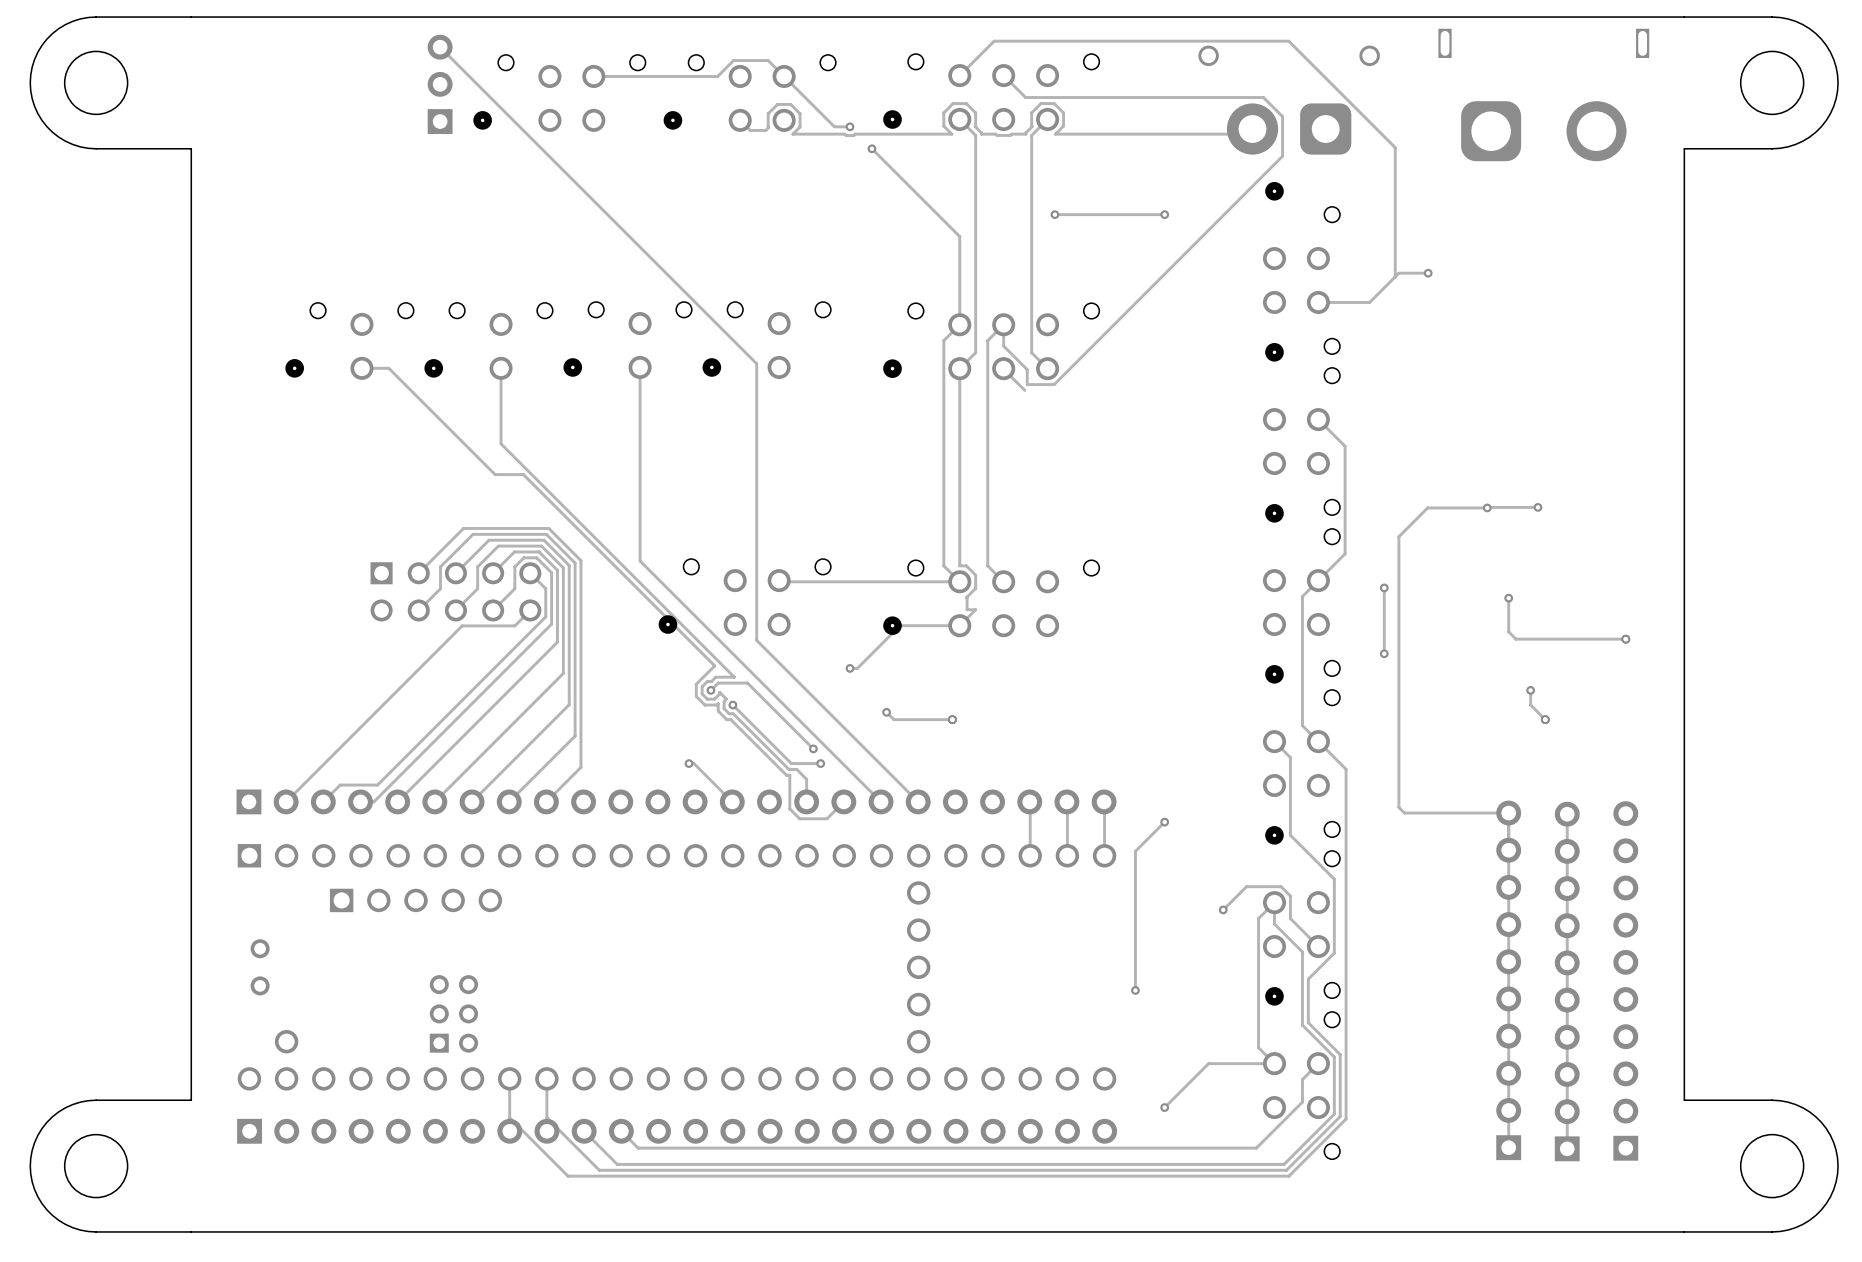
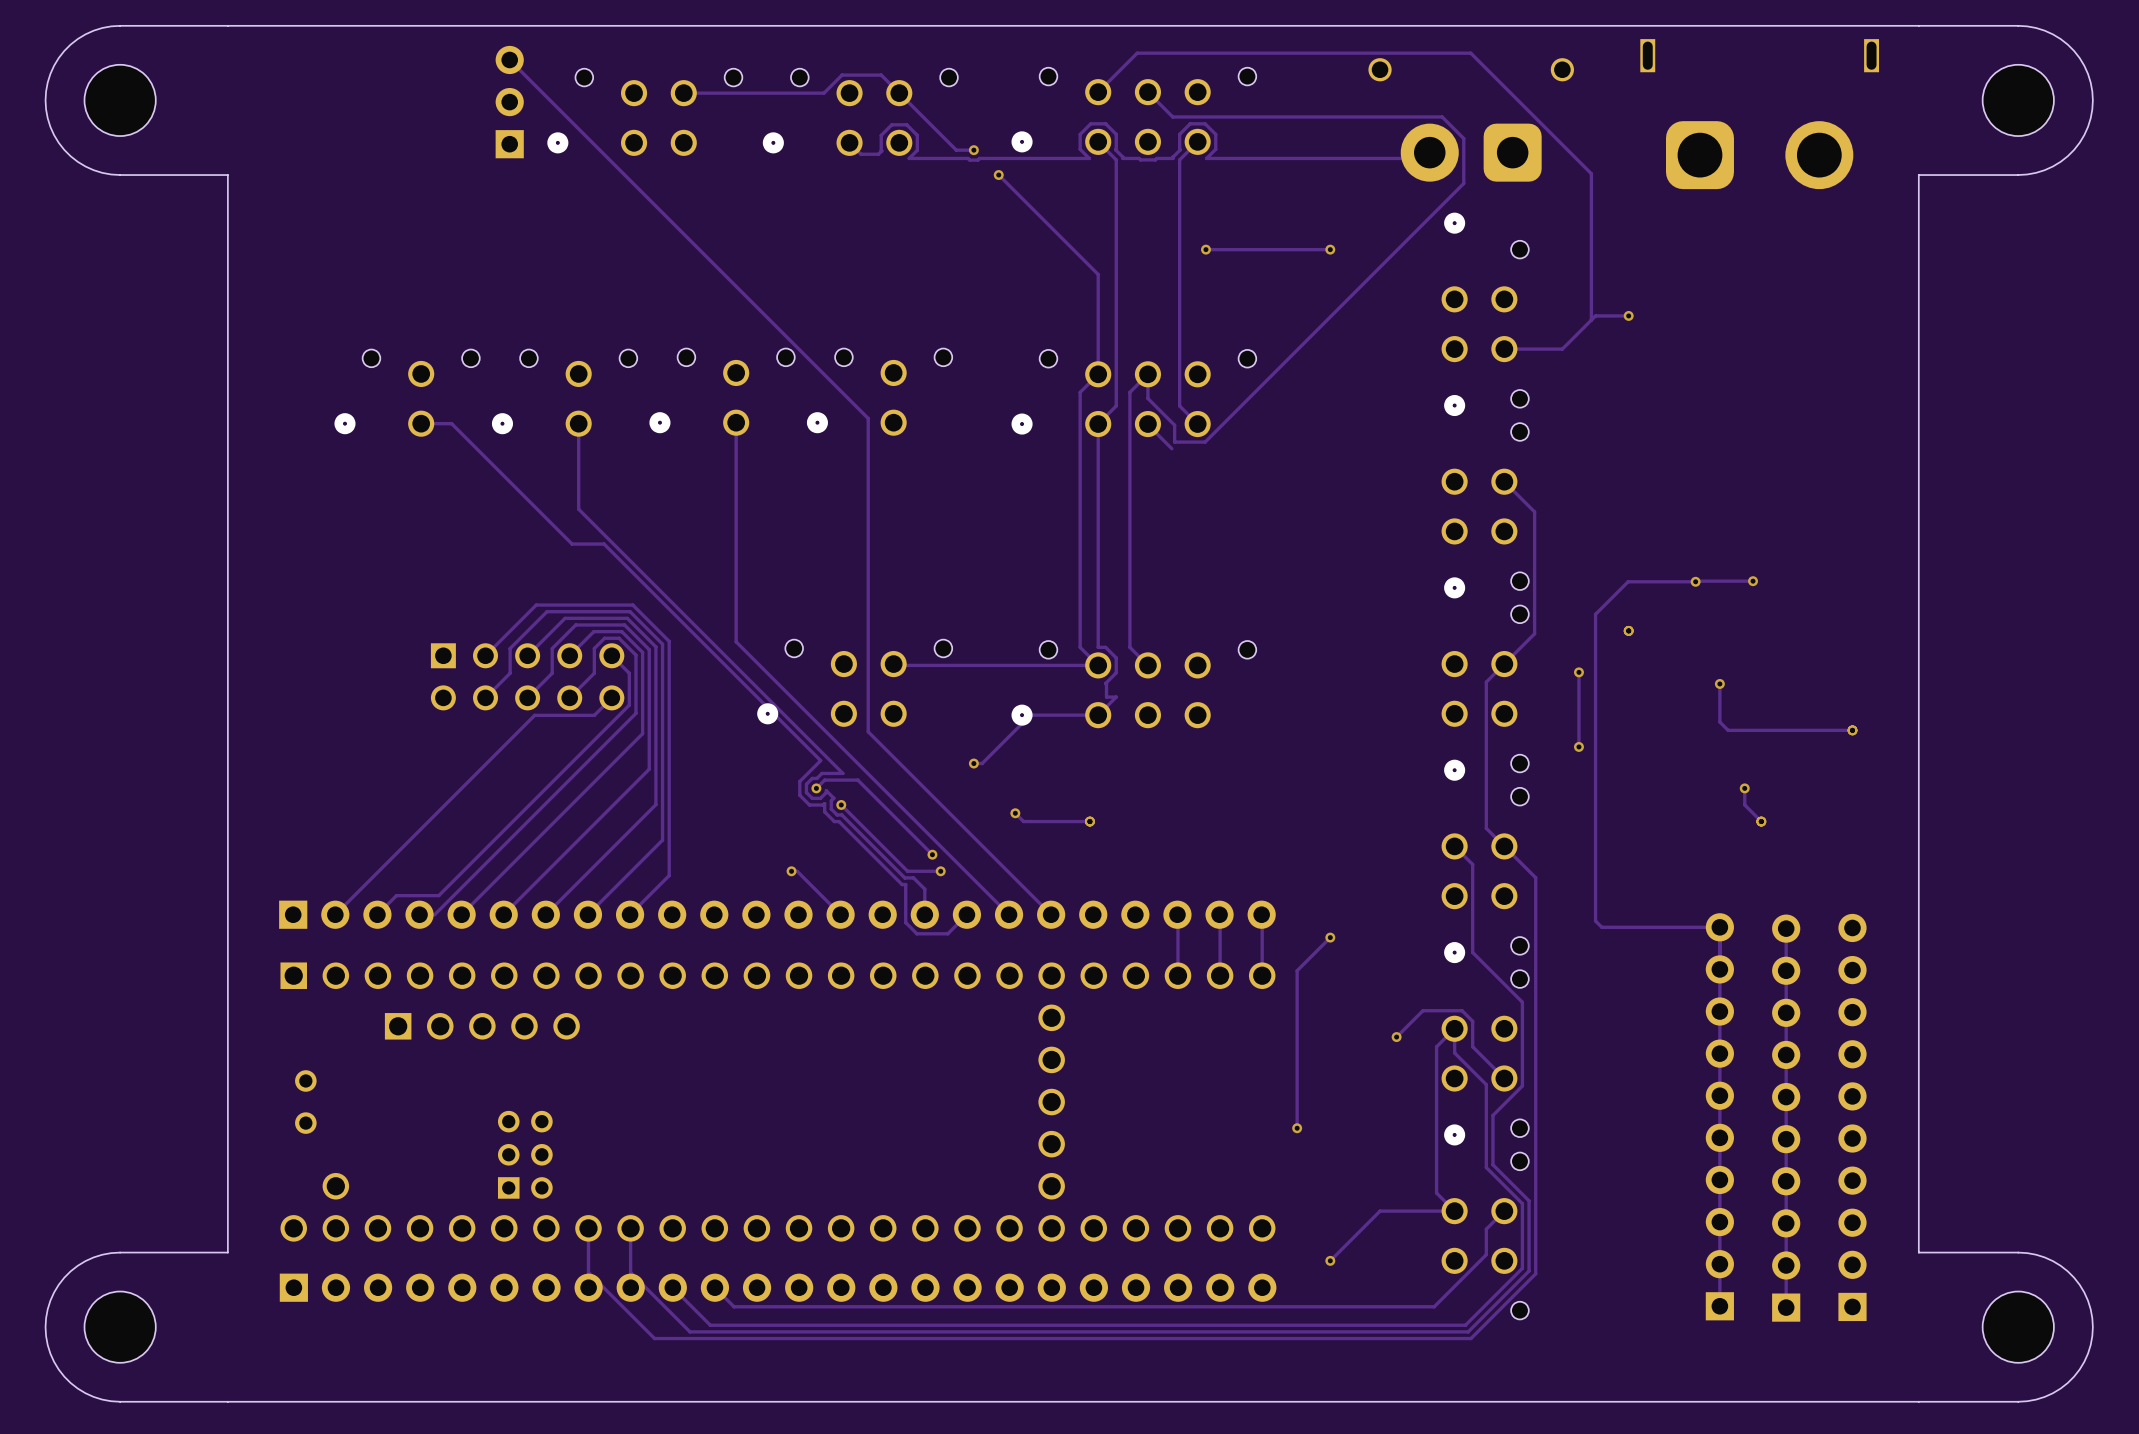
via: none -> (1628, 630)

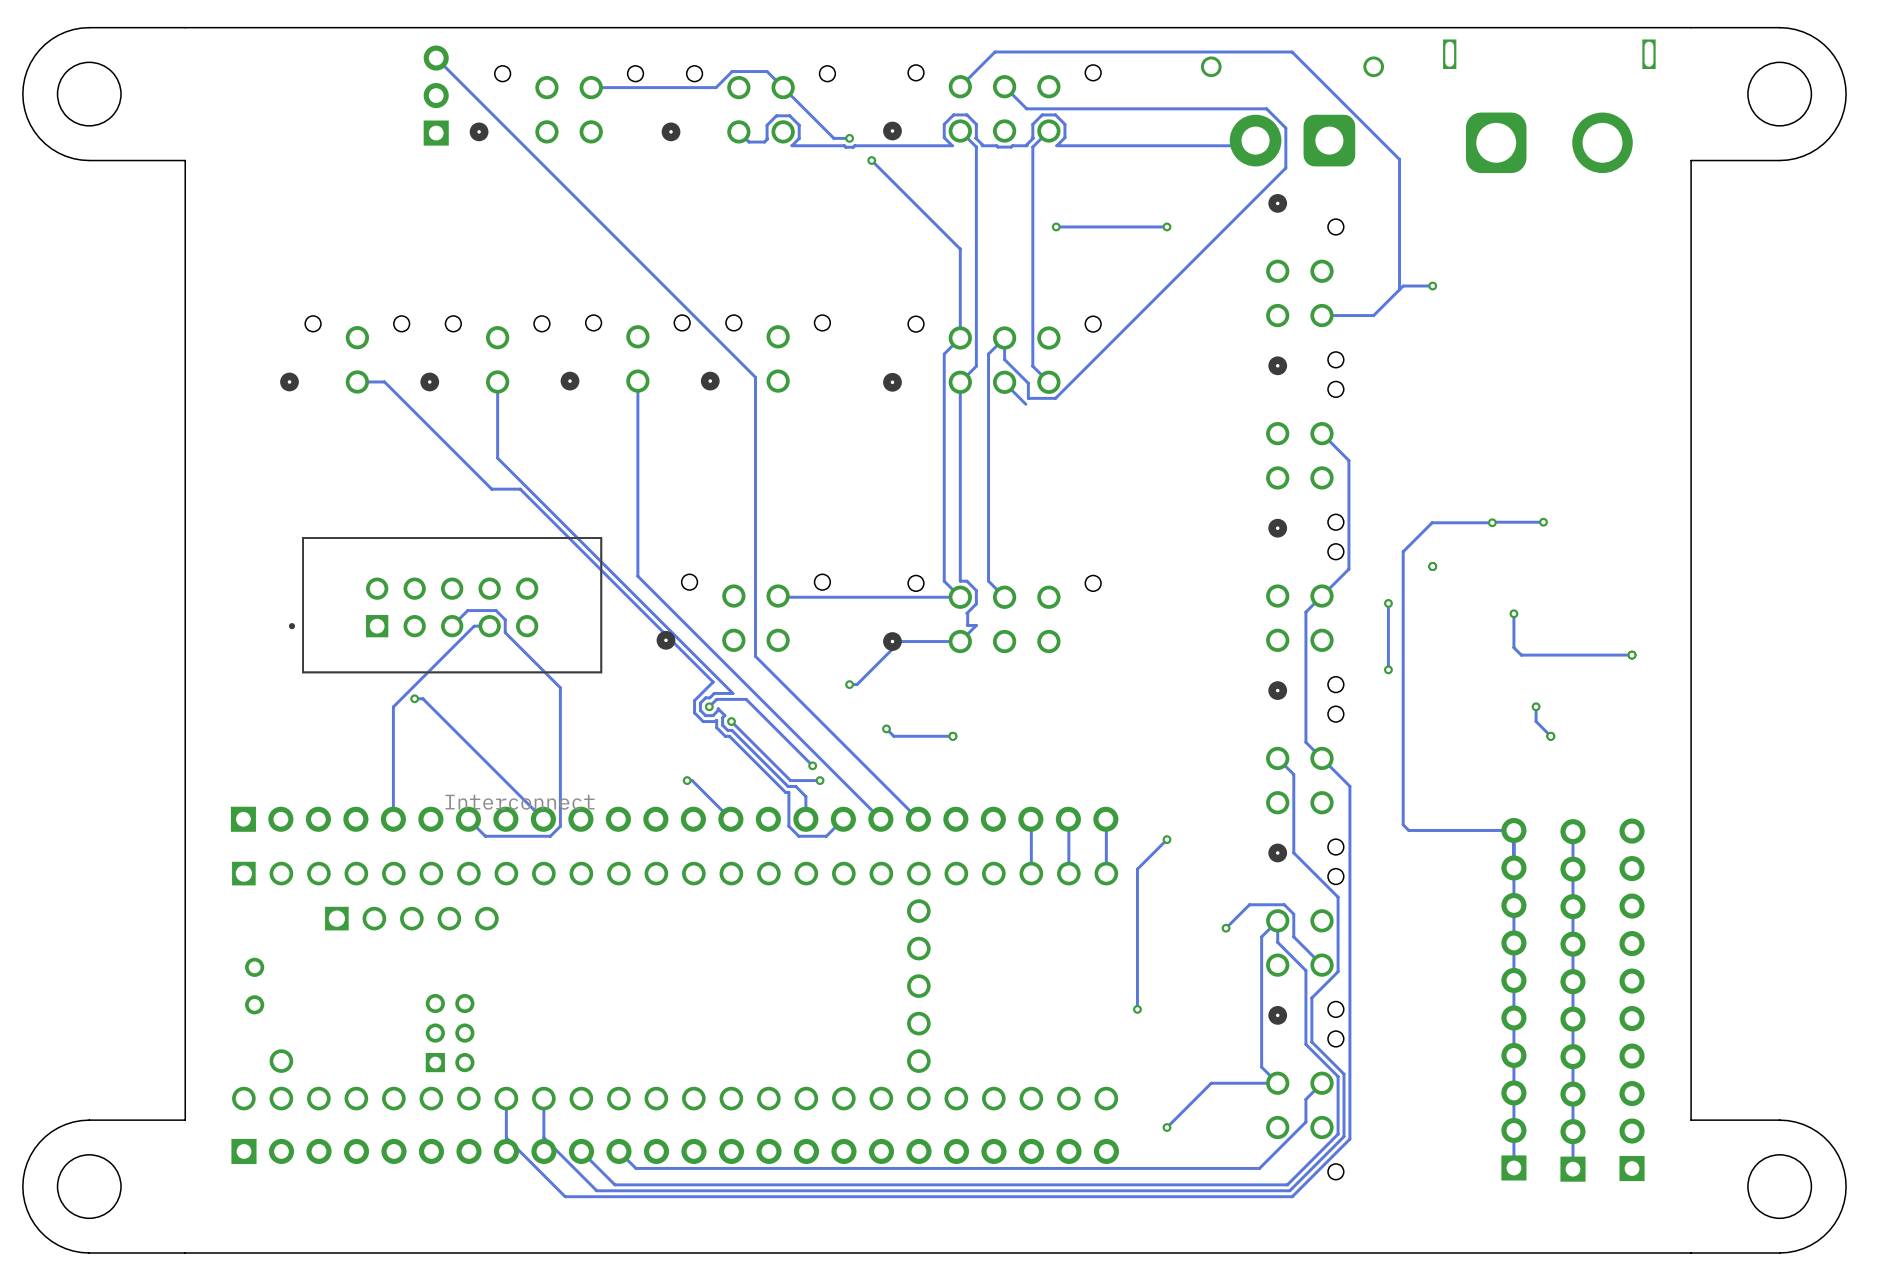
track: (485, 655) (536, 605) (632, 605) (669, 641) (669, 875) (630, 914) -> (414, 698) (422, 698) (543, 819)
track: (527, 655) (565, 618) (627, 618) (655, 646) (655, 804) (545, 914) -> (467, 610) (496, 610) (505, 619) (505, 632) (560, 687) (560, 826) (550, 836) (485, 836) (468, 819)
track: (569, 655) (593, 631) (621, 631) (642, 652) (642, 733) (461, 914) -> none
track: (611, 655) (629, 673) (629, 705) (438, 895) (396, 895) (377, 914) -> none
part side: top (527, 676) -> bottom (445, 605)
track: (545, 680) (552, 673) (552, 648) (575, 624) (624, 624) (649, 649) (649, 769) (503, 914) -> none
track: (485, 697) (510, 673) (510, 648) (546, 611) (630, 611) (662, 644) (662, 840) (587, 914) -> none
track: (569, 697) (594, 673) (594, 648) (604, 638) (619, 638) (635, 655) (635, 713) (434, 914) (419, 914) -> (489, 626) (474, 626) (393, 706) (393, 819)
track: (611, 697) (594, 715) (534, 715) (335, 914) -> none
via: none -> (414, 698)

